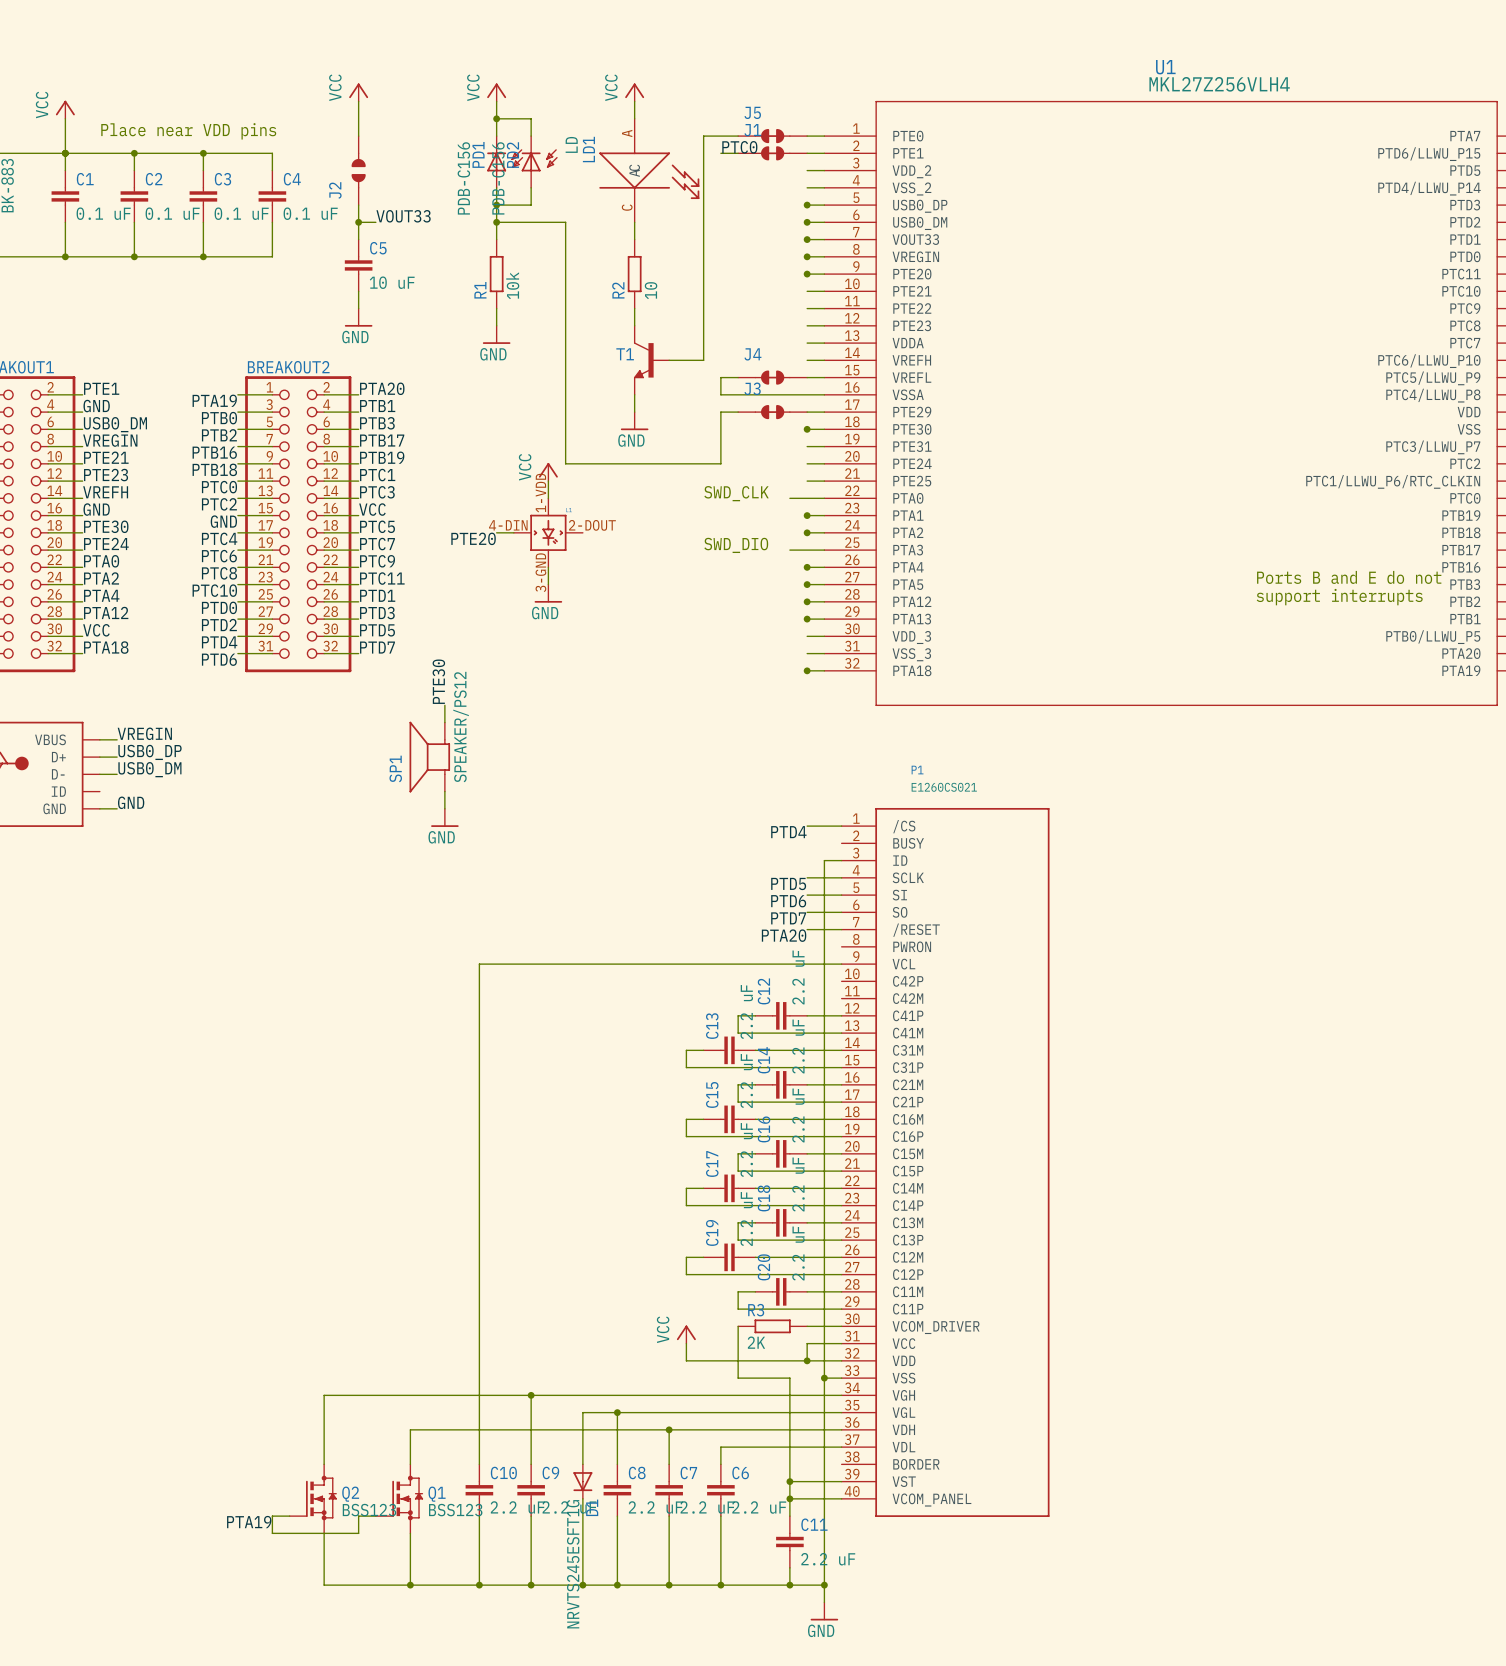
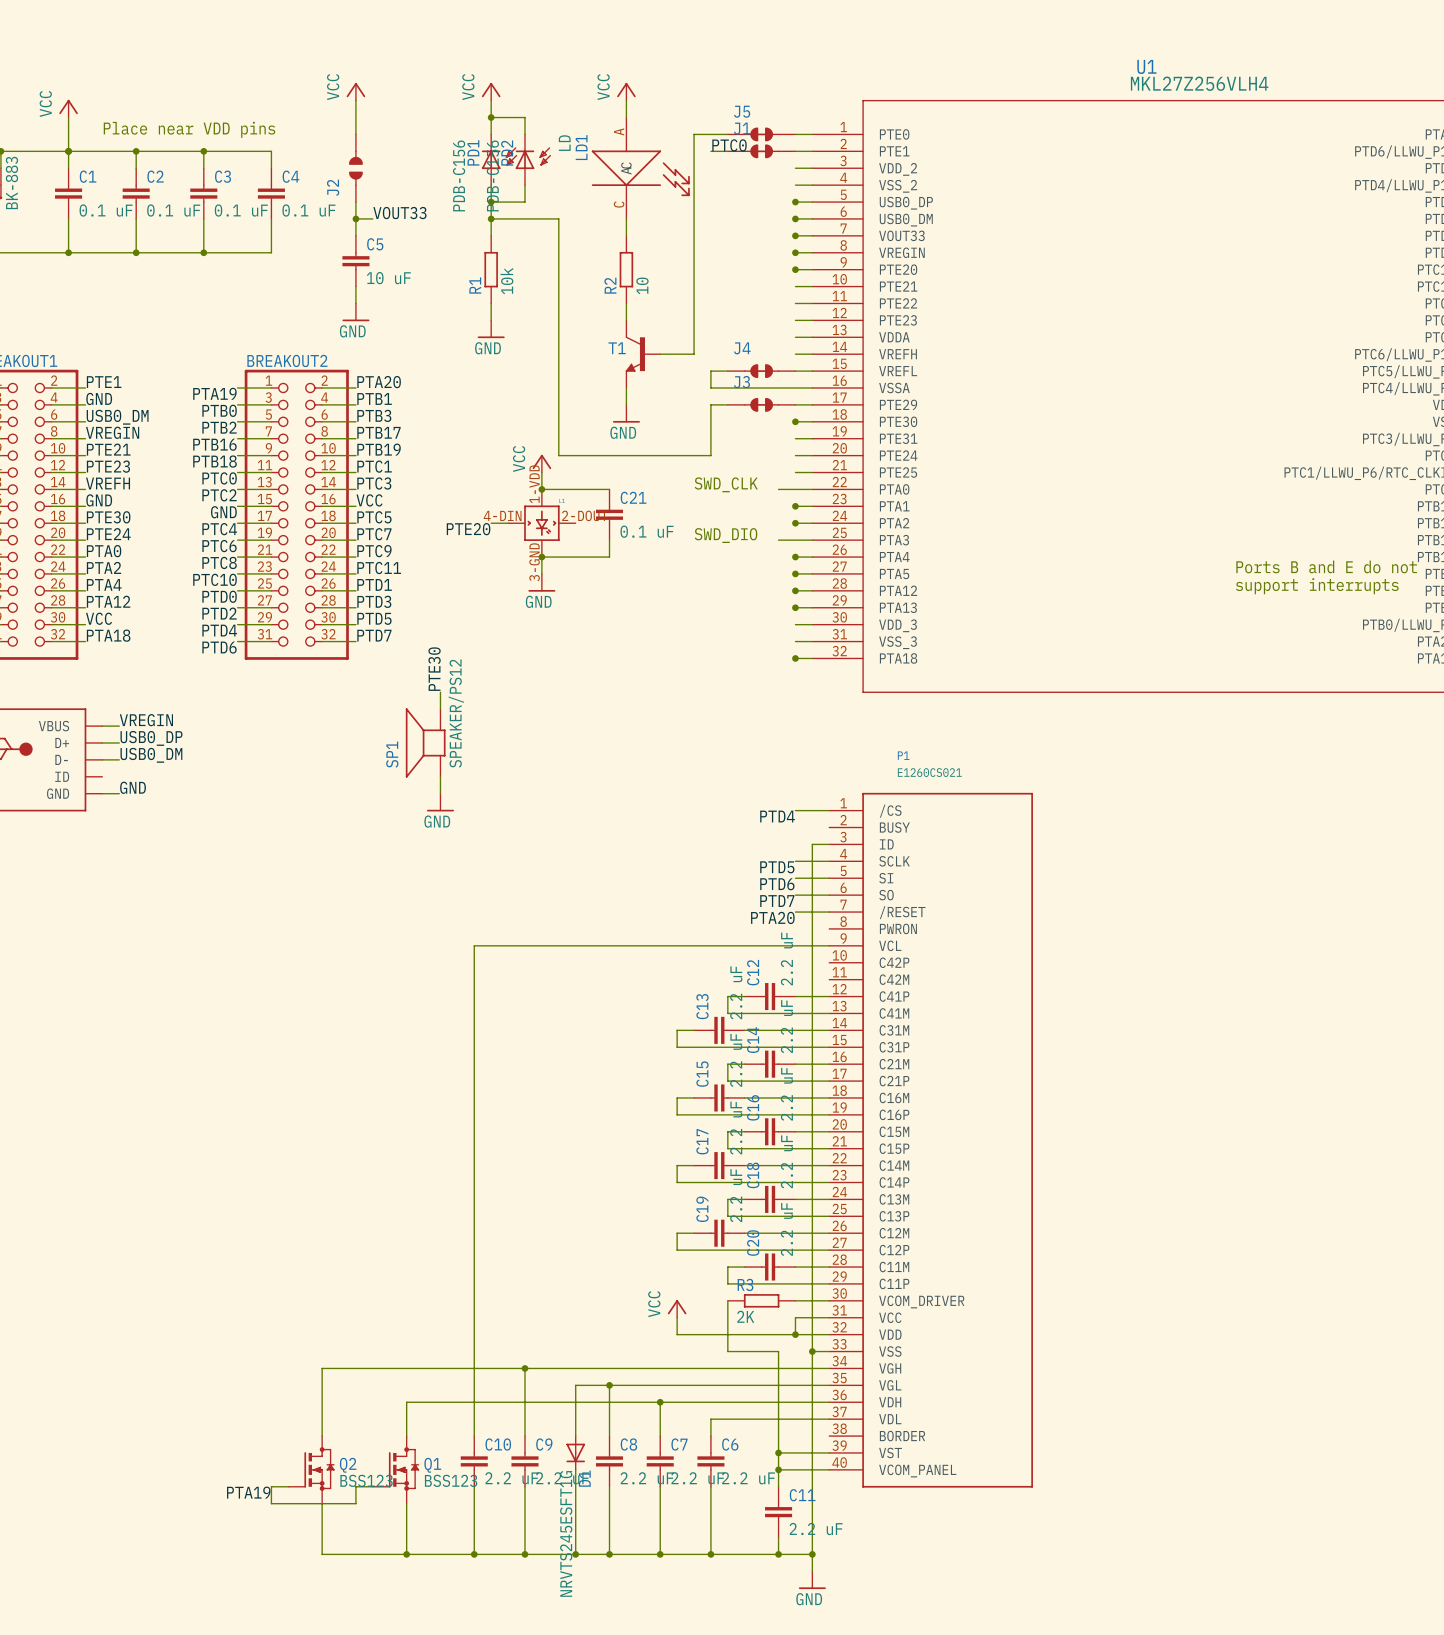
wire: none -> (541, 489) (609, 489)
junction: none -> (541, 489)
C21: none -> 0.1 uF (609, 514)
wire: none -> (609, 540) (609, 557) (541, 557)
junction: none -> (541, 557)

